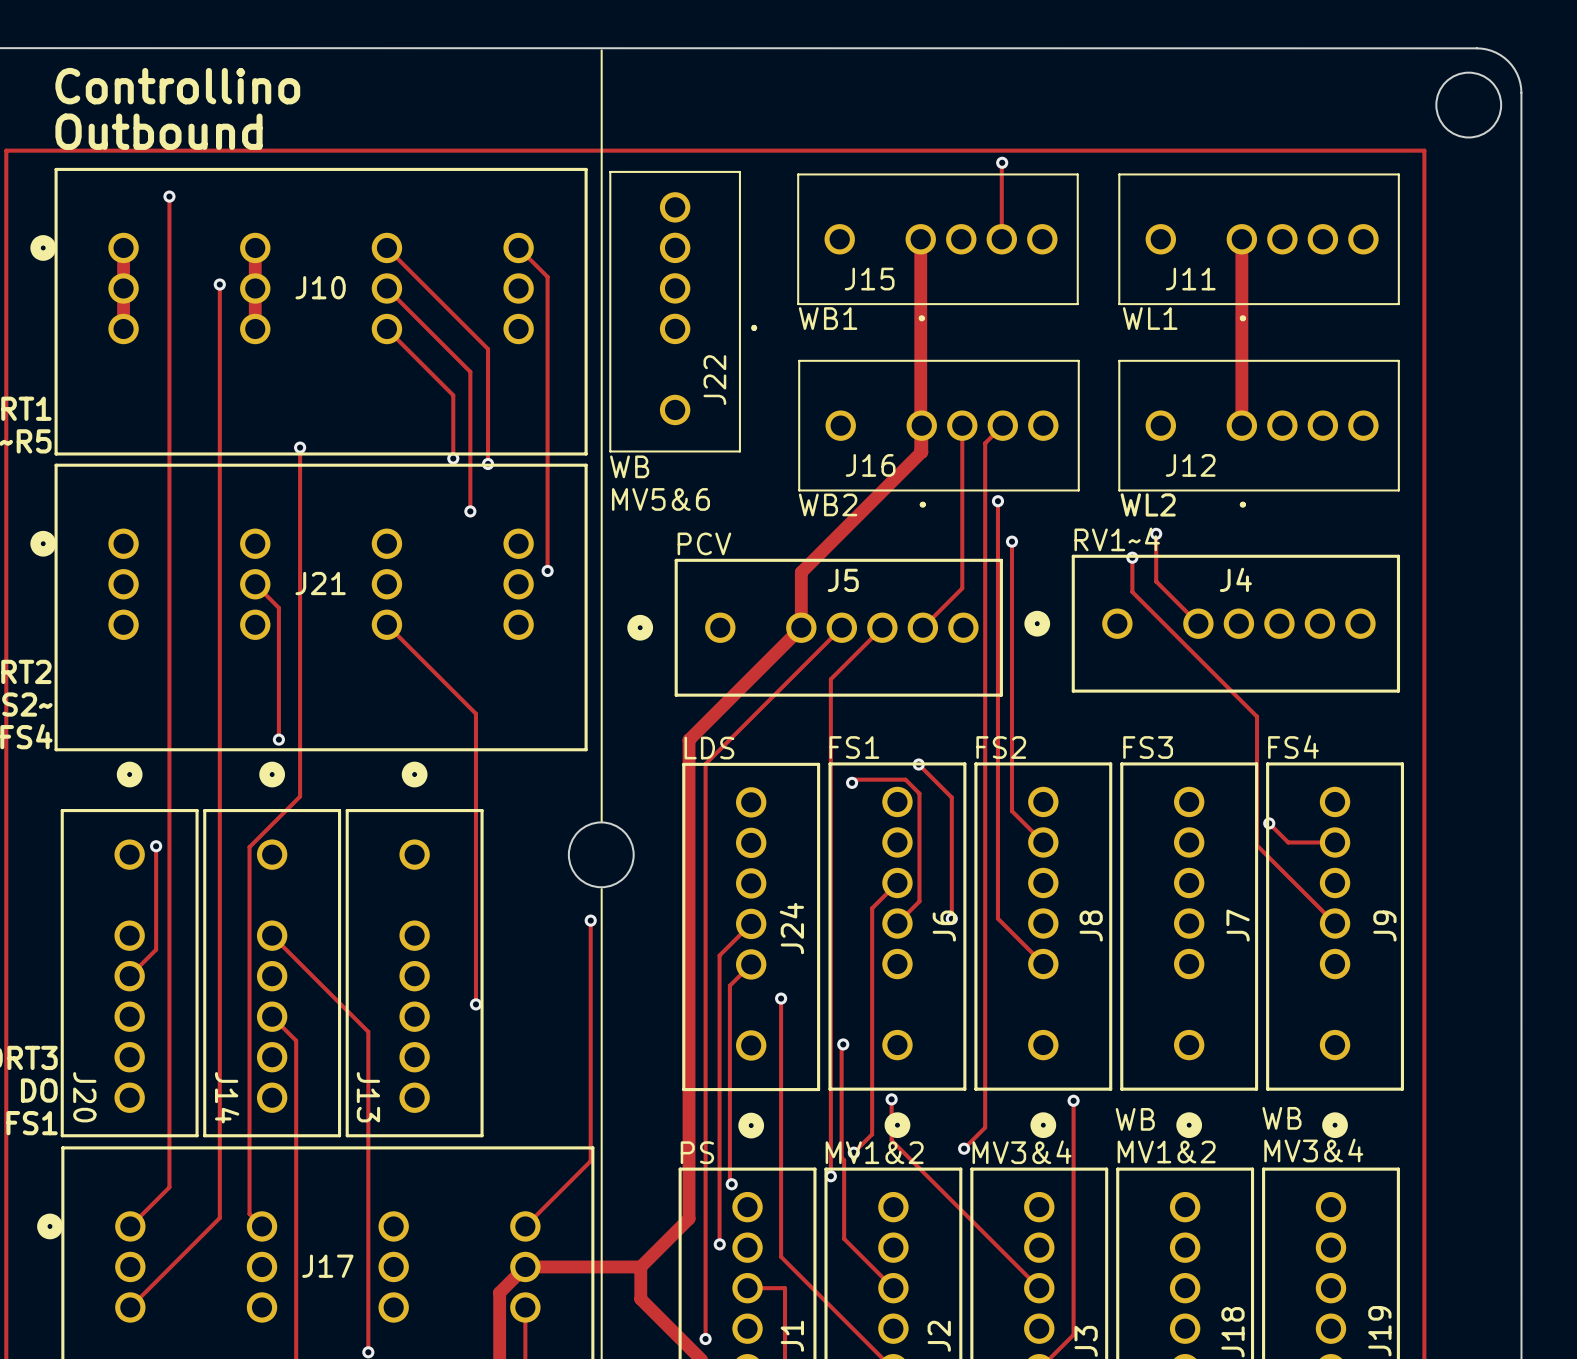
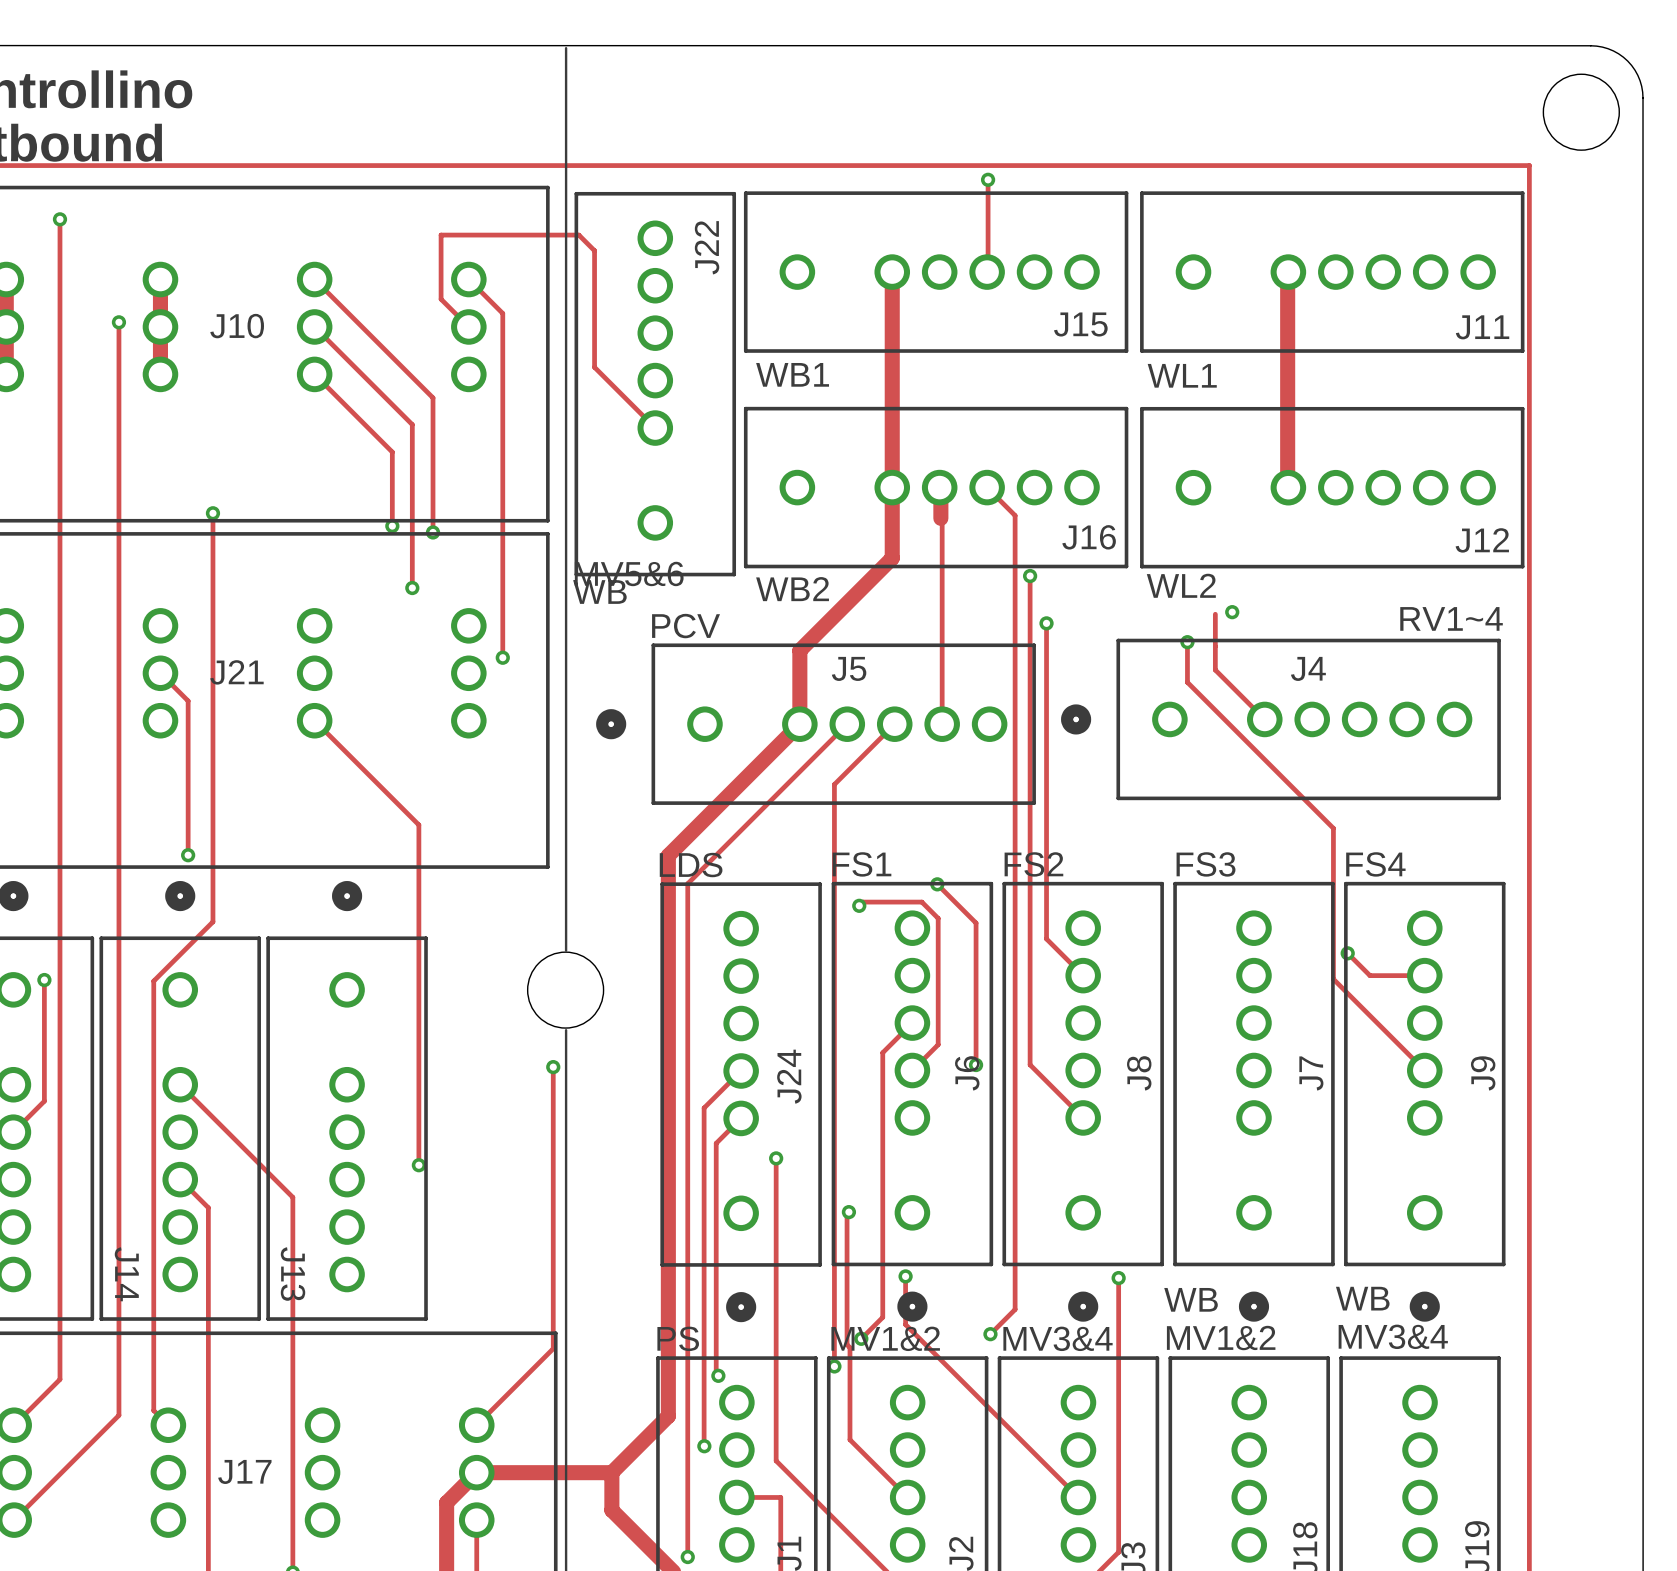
track: none -> (988, 179) (988, 272)
track: (1002, 162) (1001, 239) -> none
via position: (1002, 162) -> (988, 179)
J22 footprint: [609, 170, 758, 453] -> [574, 191, 737, 577]
J15 footprint: [797, 173, 1079, 322] -> [743, 191, 1129, 353]
J11 footprint: [1118, 173, 1400, 322] -> [1140, 191, 1525, 353]
track: (920, 239) (921, 451) (801, 572) -> (893, 272) (892, 558) (799, 650) (799, 659)
track: (1241, 239) (1241, 425) -> none
track: none -> (1288, 272) (1287, 487)
J15 name position: J15 (869, 279) -> J15 (1080, 324)
J11 name position: J11 (1190, 279) -> J11 (1482, 327)
track: none -> (468, 326) (441, 299) (441, 235) (578, 235) (594, 250) (594, 367) (655, 428)
text position: WB1 (828, 318) -> WB1 (792, 374)
text position: WL1 (1150, 318) -> WL1 (1182, 375)
J16 footprint: [798, 359, 1080, 508] -> [743, 406, 1129, 569]
J12 footprint: [1118, 359, 1400, 508] -> [1140, 406, 1525, 569]
J22 name position: J22 (714, 380) -> J22 (707, 247)
track: (962, 425) (962, 588) (922, 627) -> (939, 487) (942, 490) (942, 724)
track: (1002, 425) (985, 443) (985, 449) -> (987, 487) (1015, 515)
J16 name position: J16 (870, 465) -> J16 (1089, 537)
J12 name position: J12 (1190, 465) -> J12 (1482, 540)
text position: WB (629, 466) -> WB (599, 592)
text position: WB2 (828, 504) -> WB2 (792, 589)
text position: WL2 (1148, 504) -> WL2 (1181, 585)
via position: (1156, 533) -> (1232, 612)
J4 value position: RV1~4 (1117, 539) -> RV1~4 (1451, 618)

